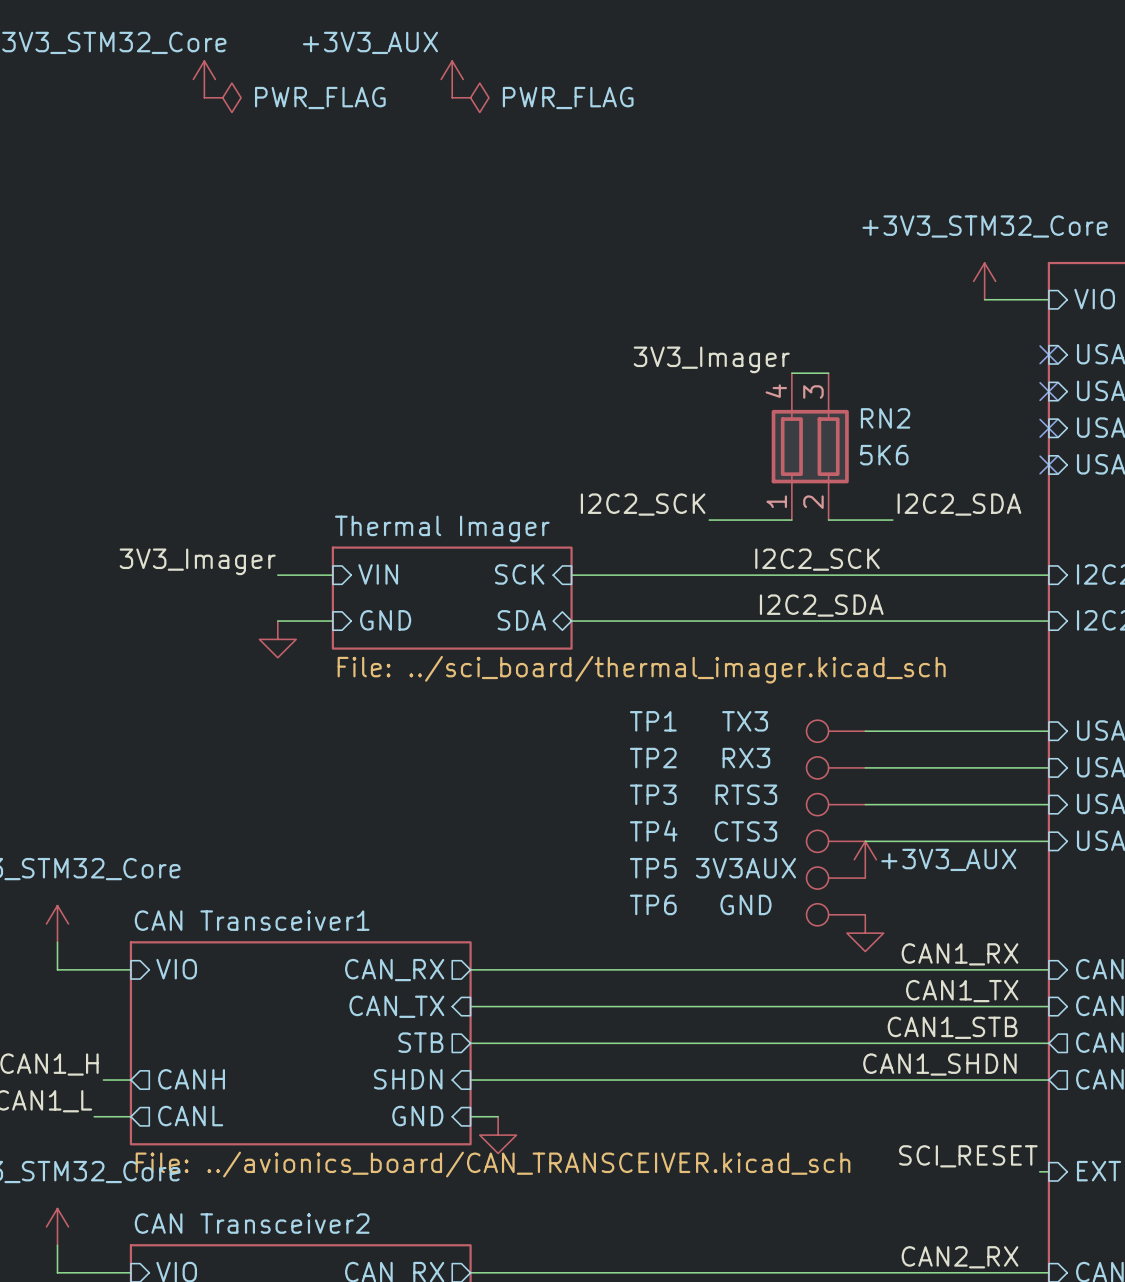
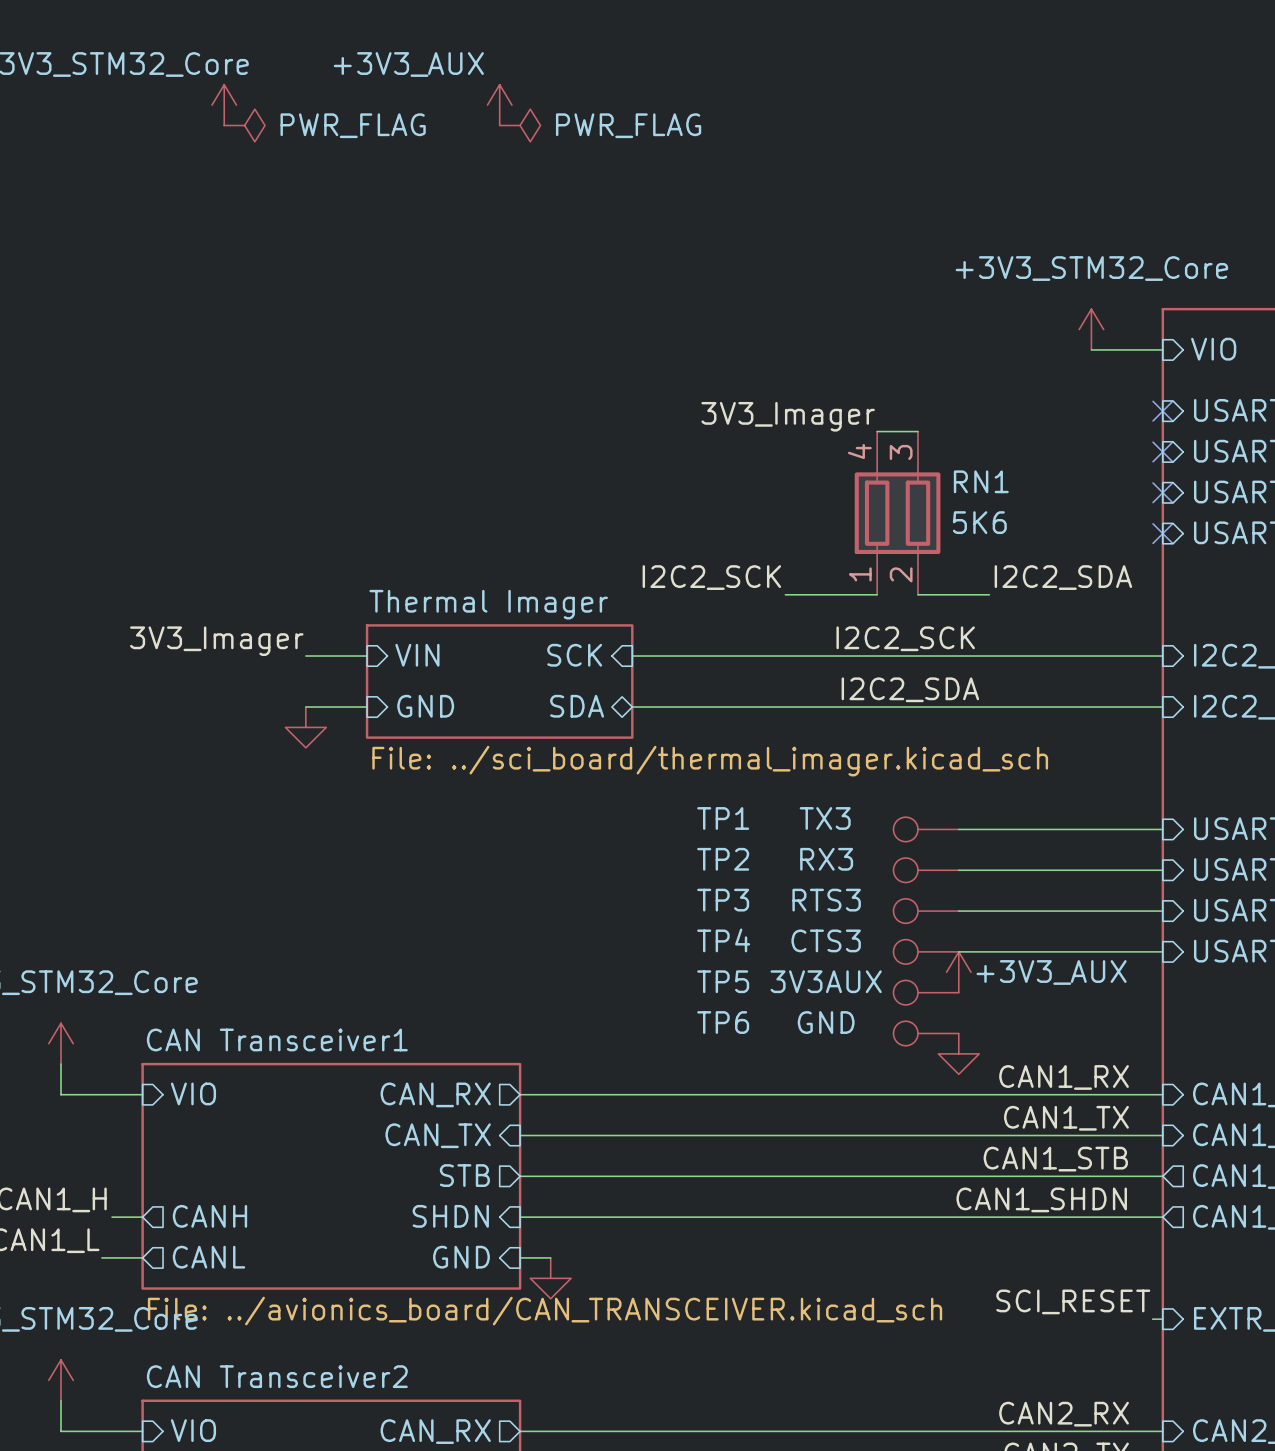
RN2 name: RN2 (885, 418) -> RN1 (981, 481)

